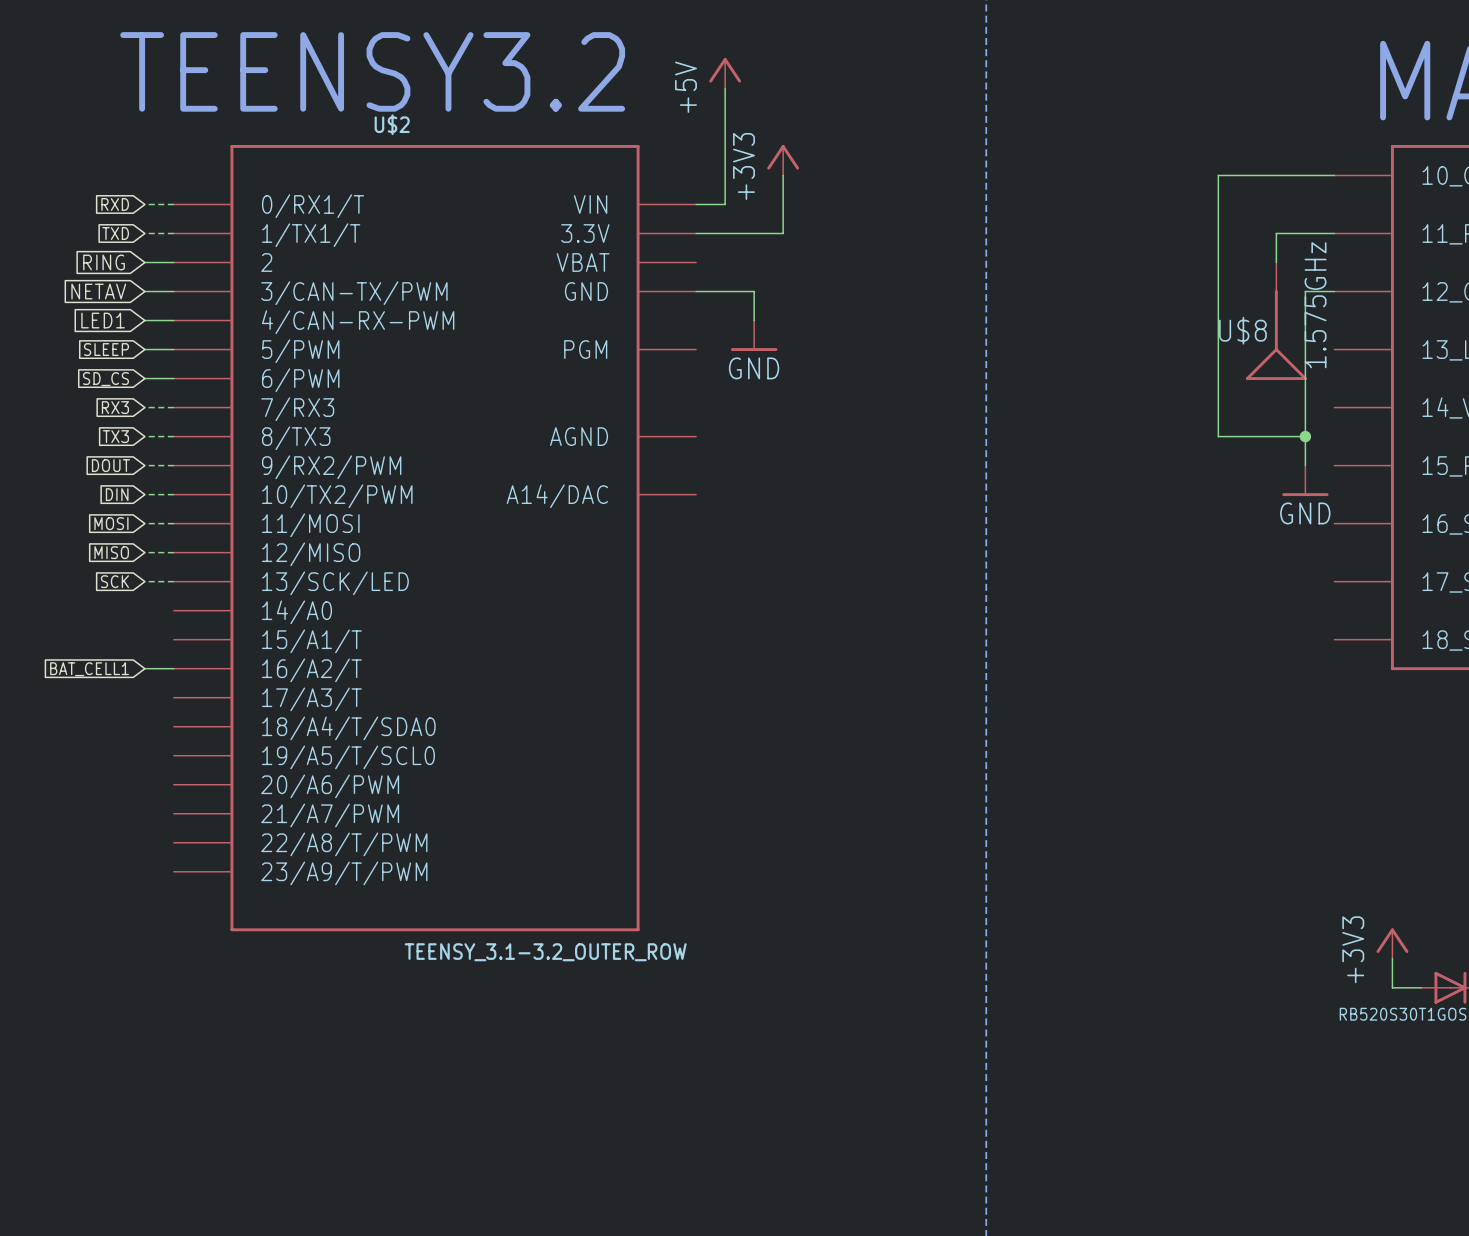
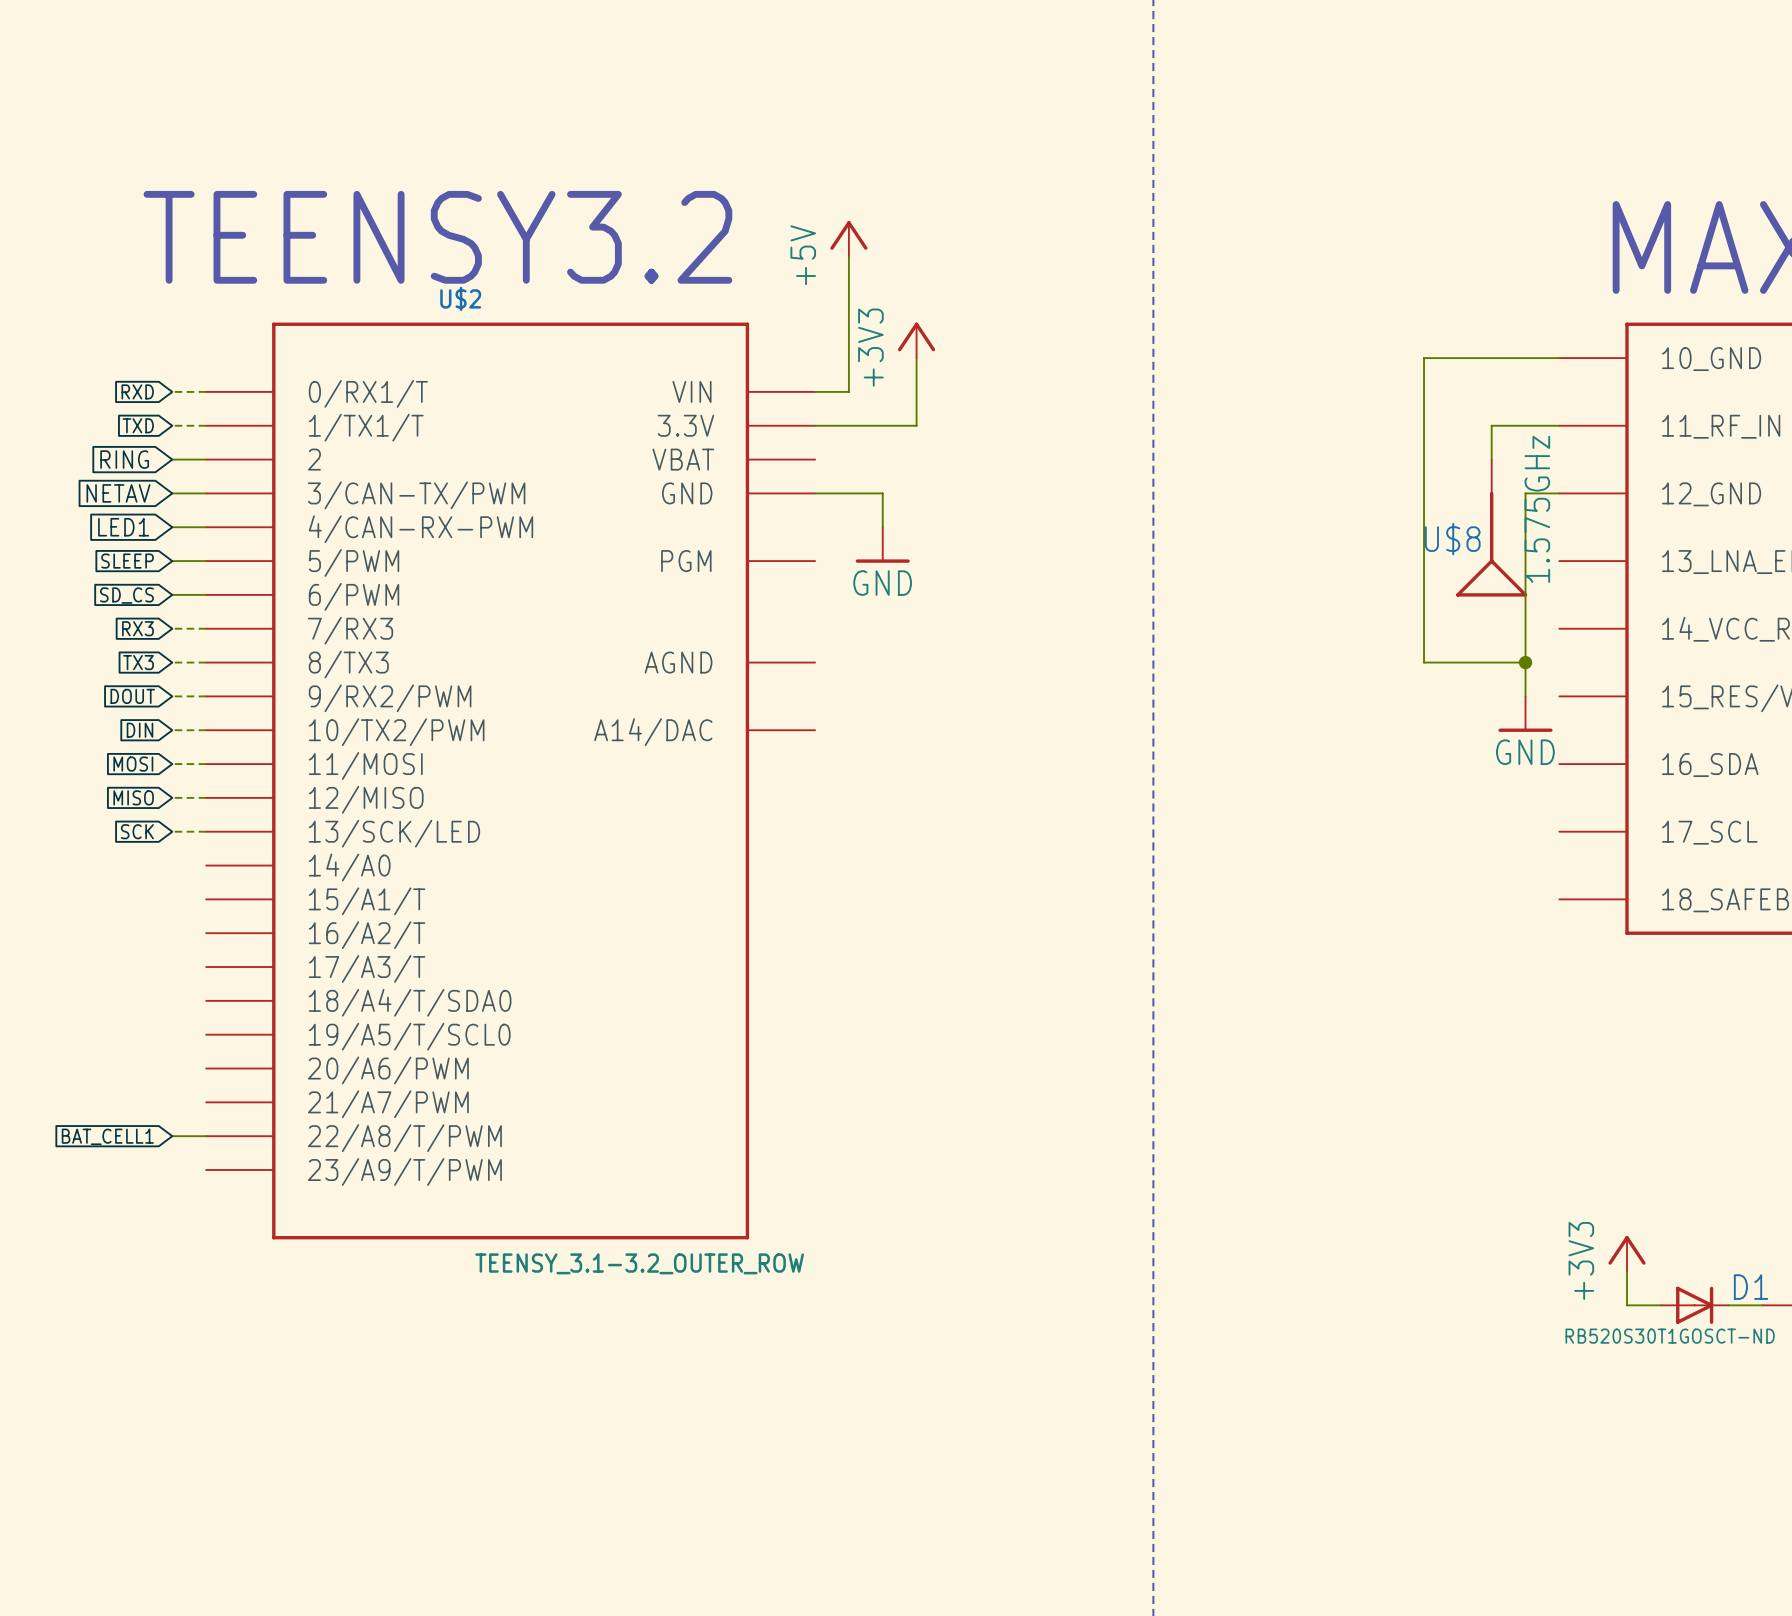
wire: (144, 668) (173, 668) -> (172, 1136) (206, 1136)
global label position: BAT_CELL1 (89, 669) -> BAT_CELL1 (107, 1136)

